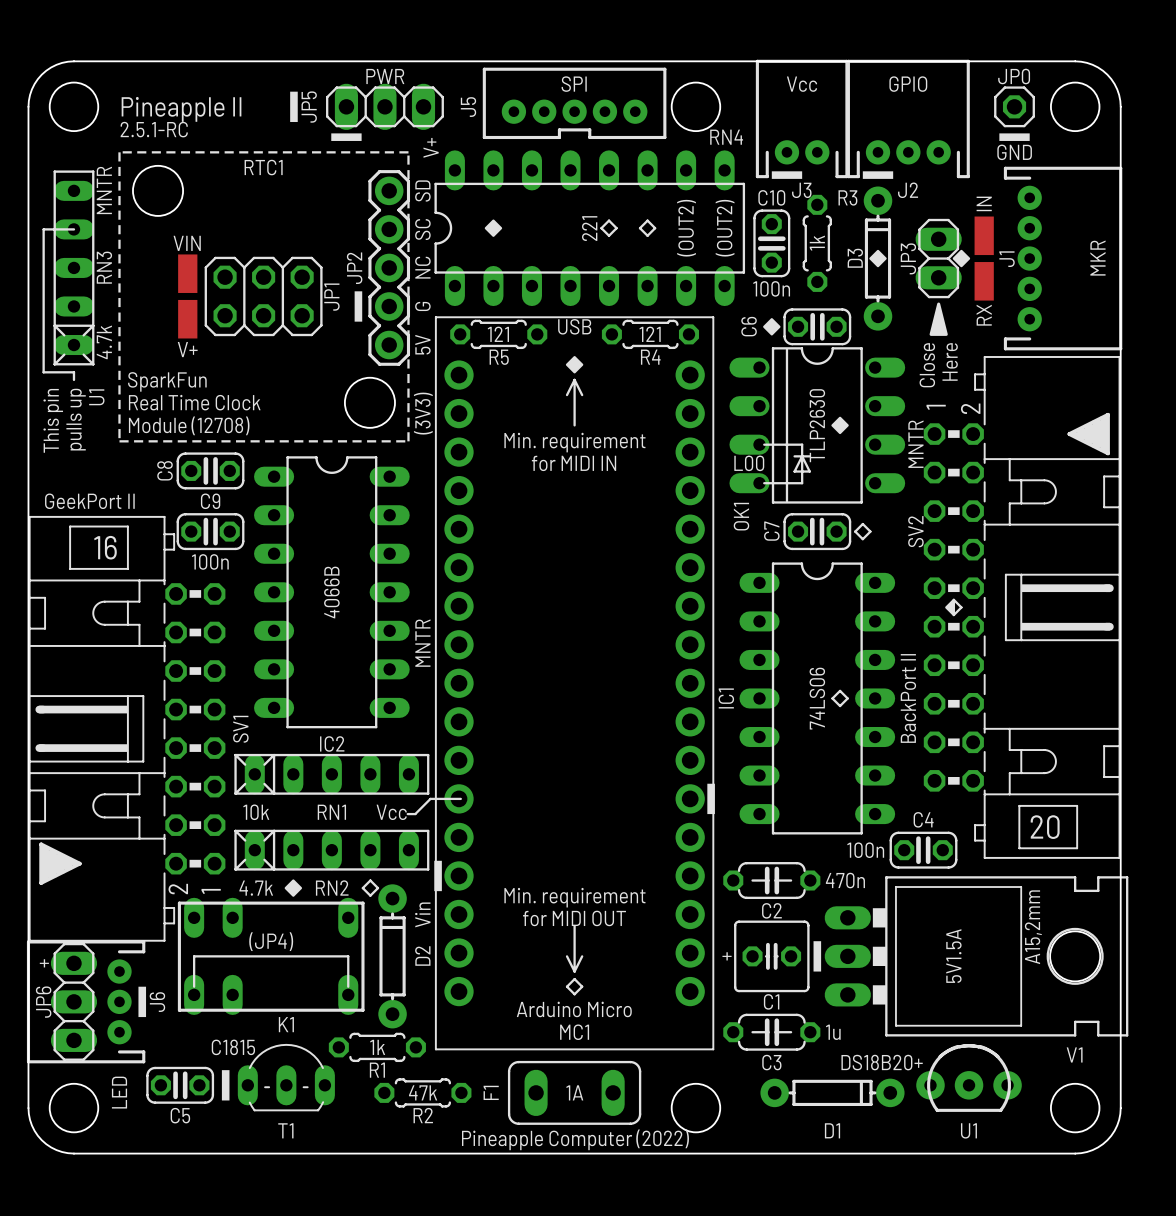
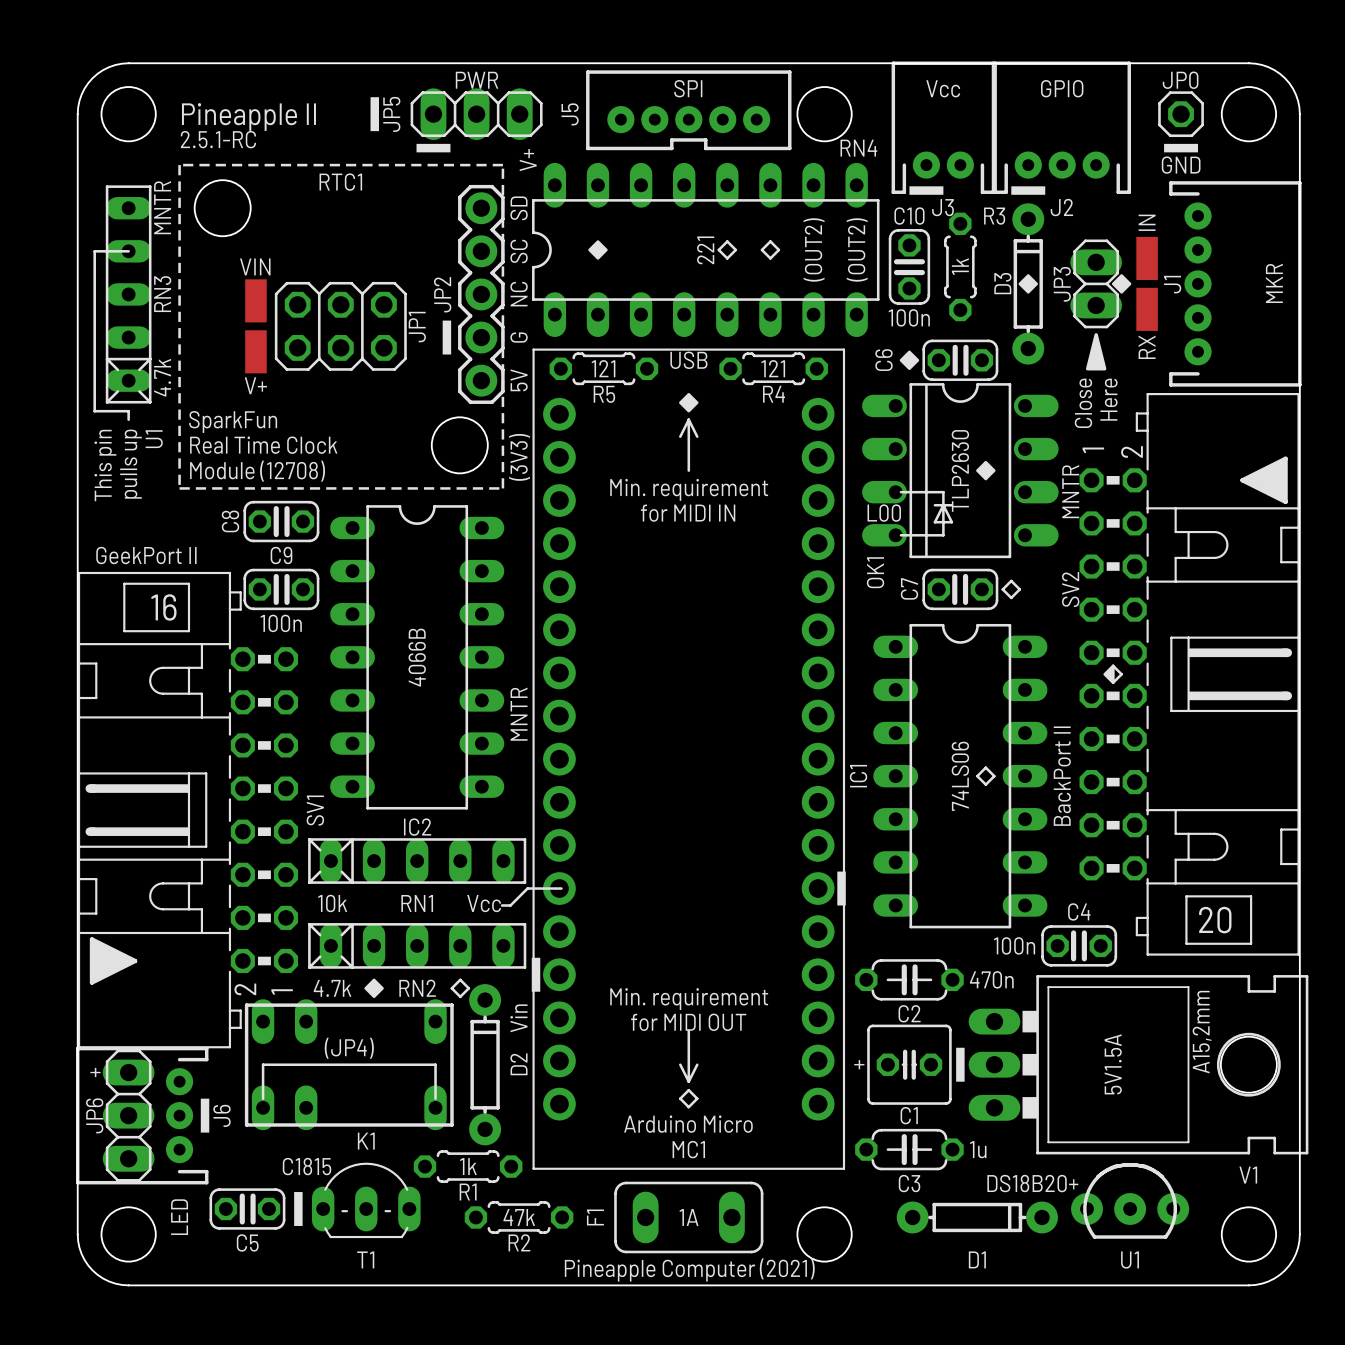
text: Pineapple Computer (2022) (575, 1139) -> Pineapple Computer (2021) (689, 1270)

